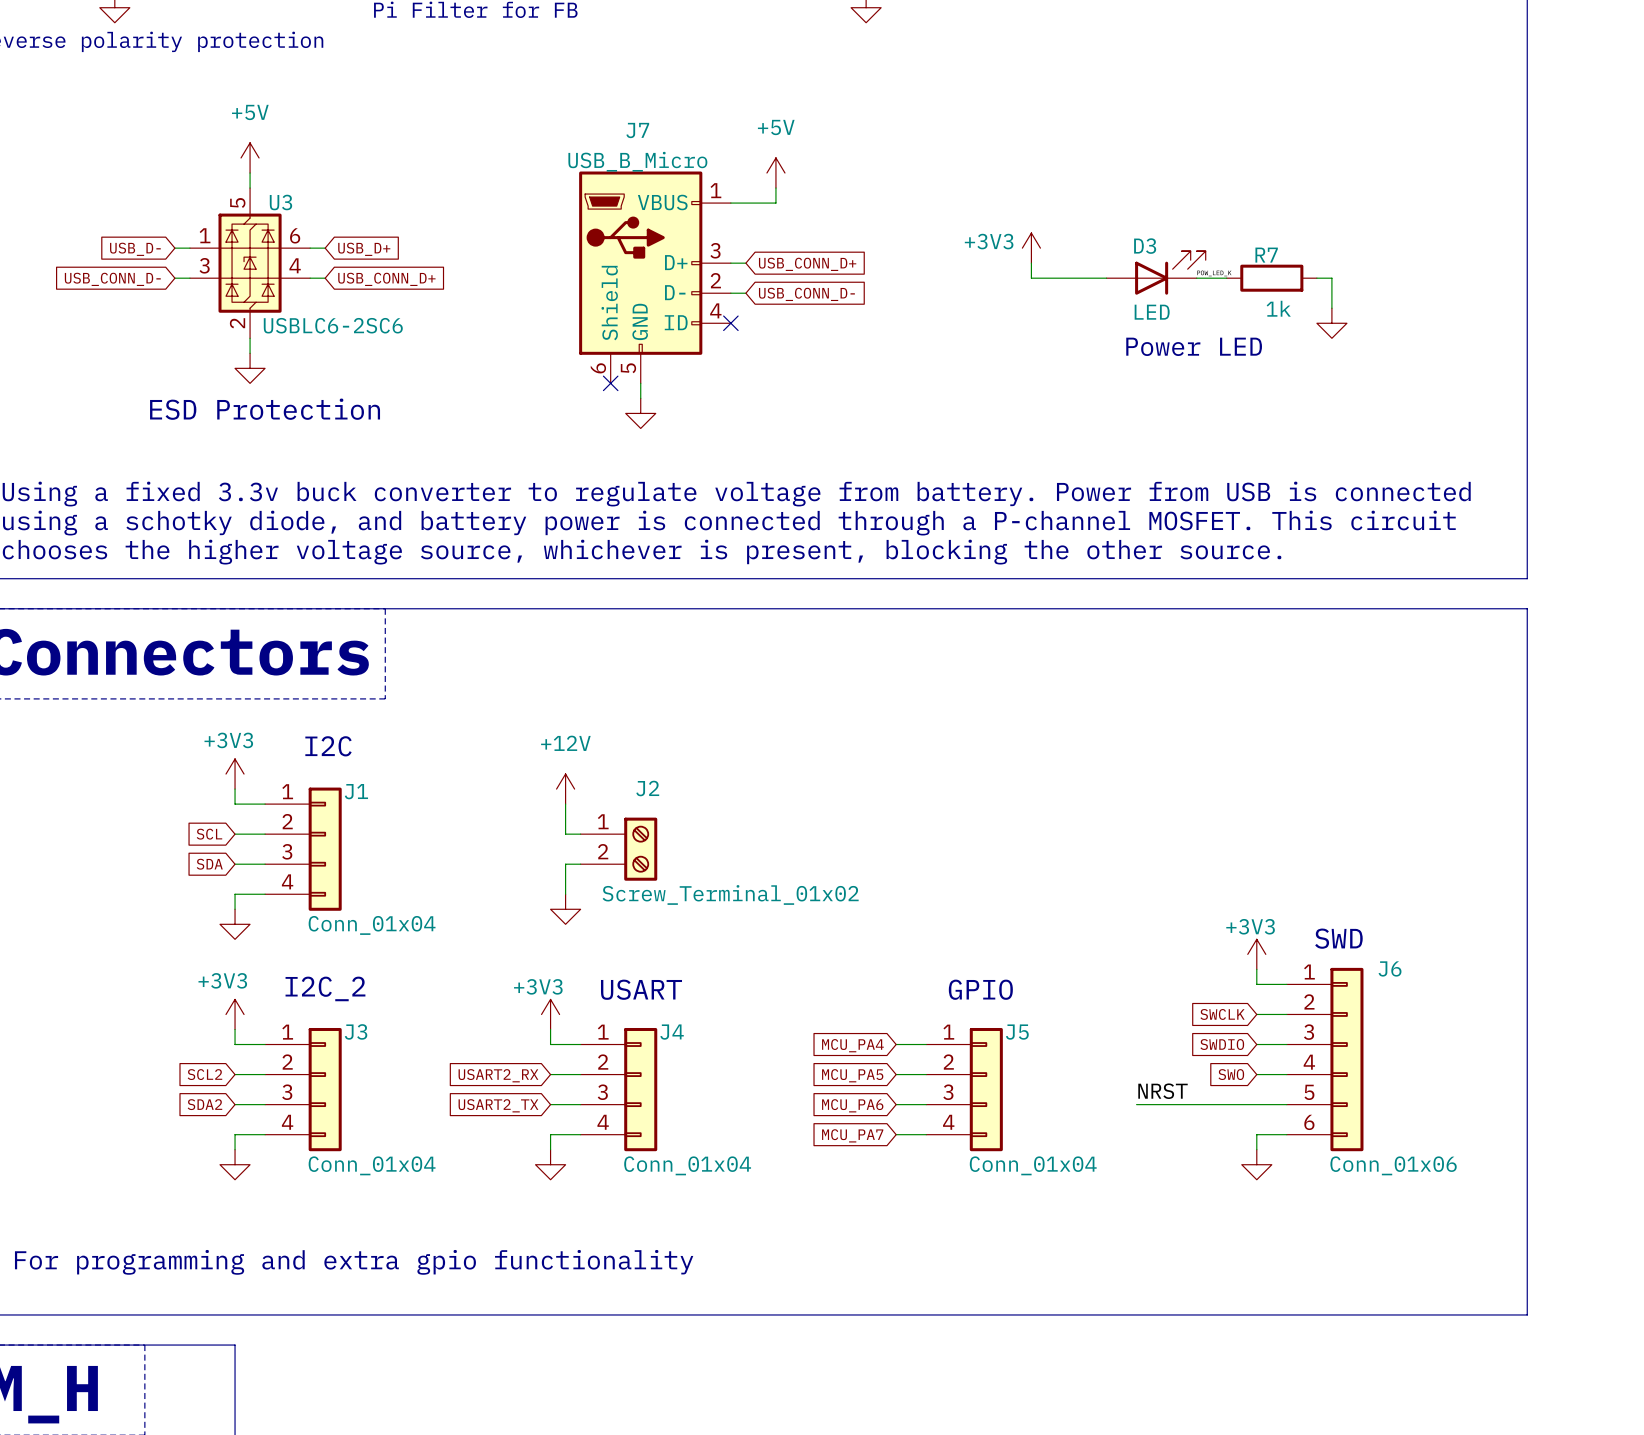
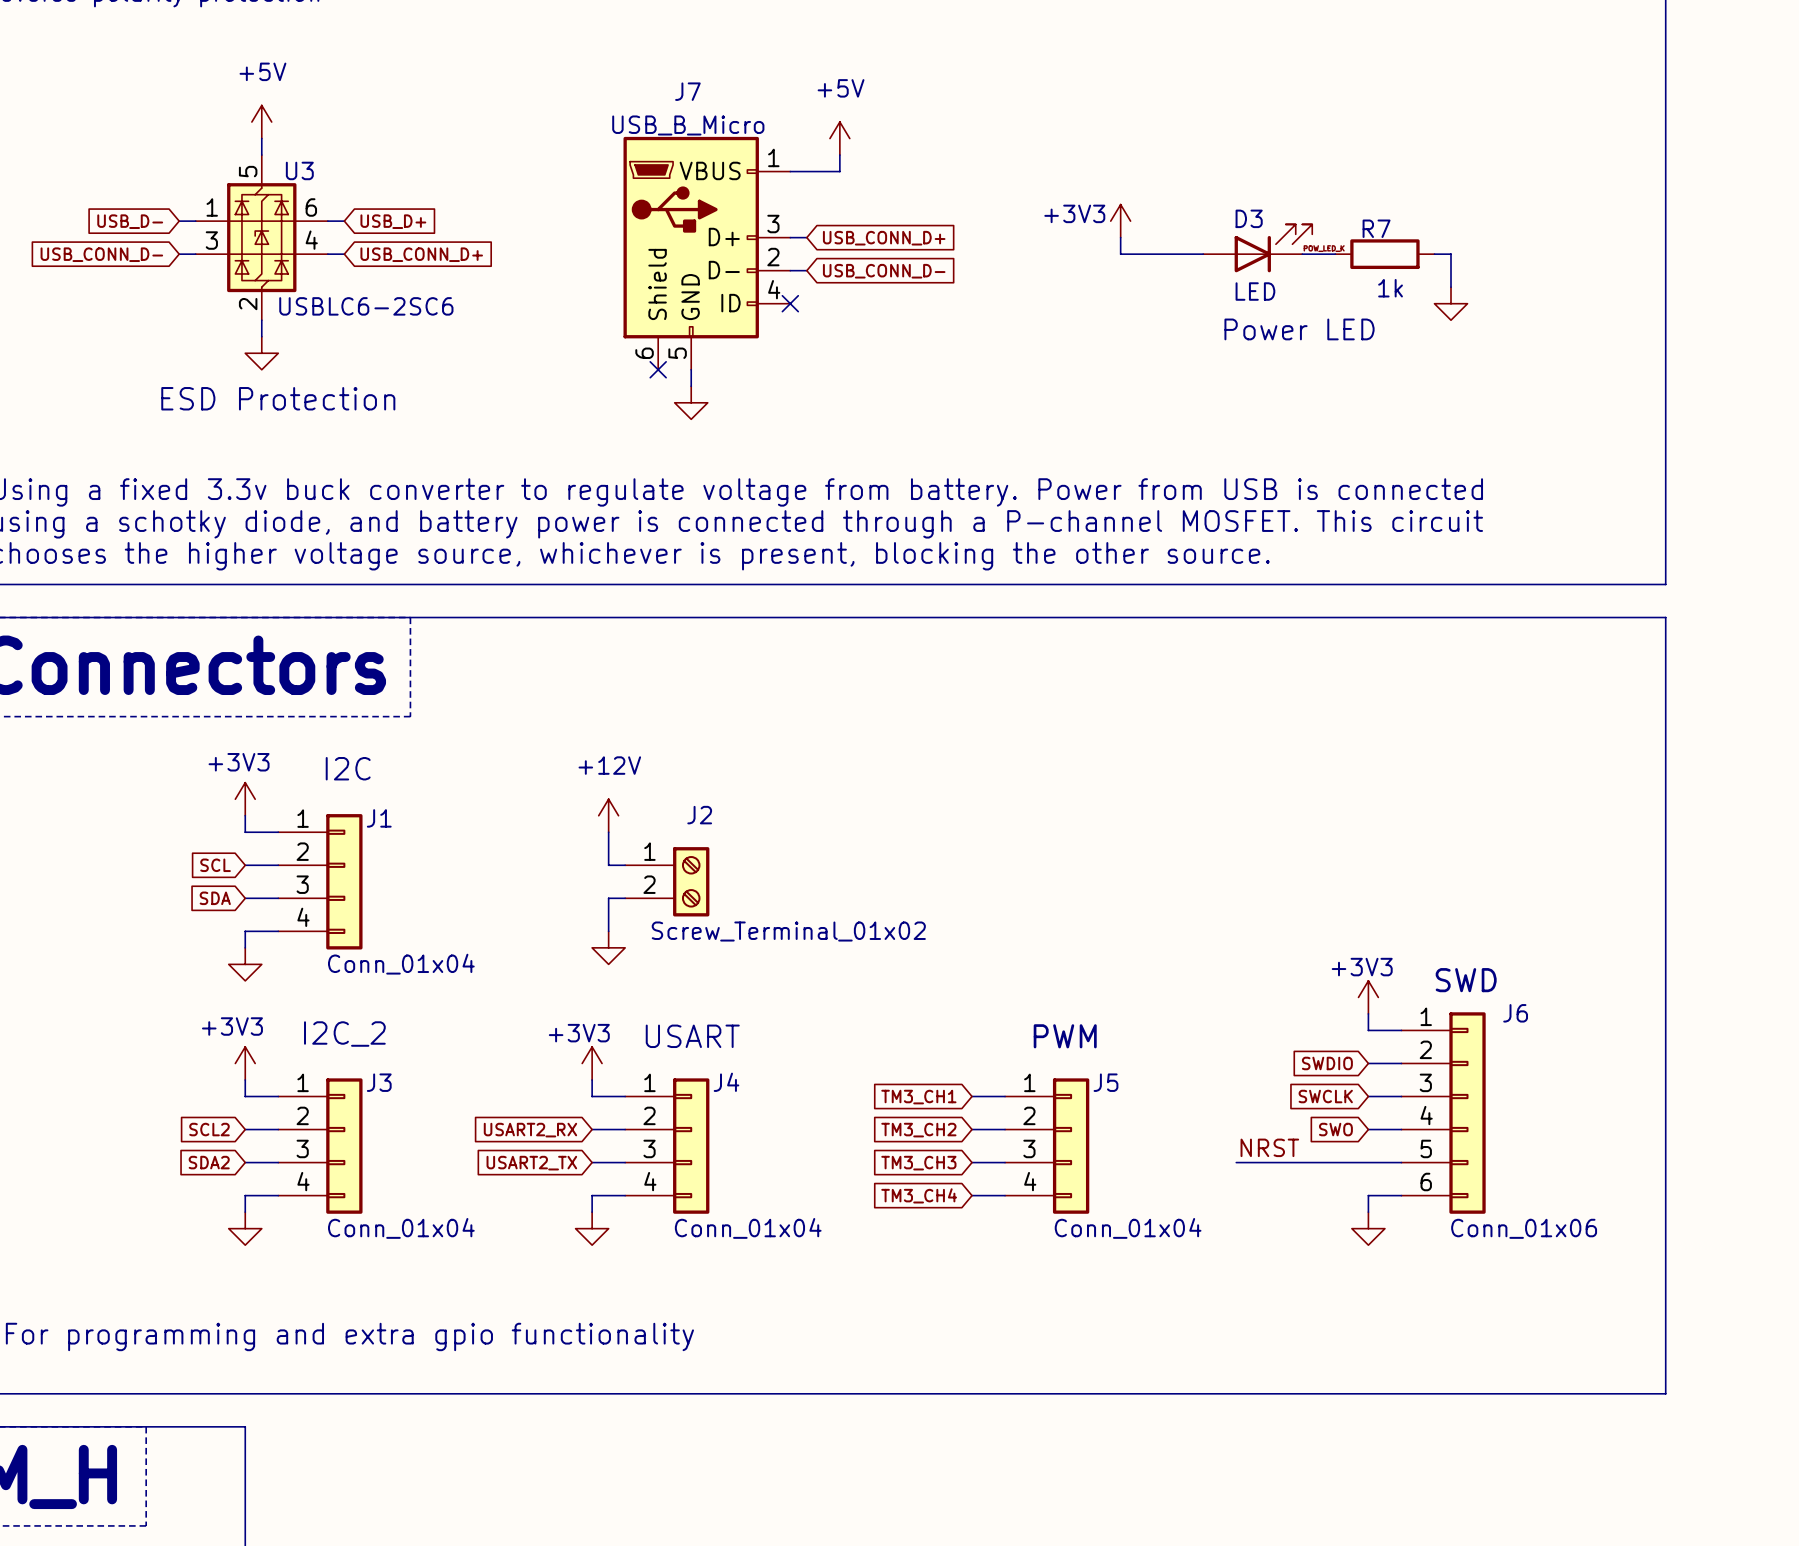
text: GPIO (980, 989) -> PWM (1065, 1036)
global label: SWCLK (1222, 1014) -> SWDIO (1327, 1063)
global label: SWDIO (1222, 1044) -> SWCLK (1325, 1096)
global label: MCU_PA4 (852, 1045) -> TM3_CH1 (918, 1097)
global label: MCU_PA5 (852, 1075) -> TM3_CH2 (918, 1130)
global label: MCU_PA6 (852, 1105) -> TM3_CH3 (918, 1163)
global label: MCU_PA7 (852, 1135) -> TM3_CH4 (919, 1195)

